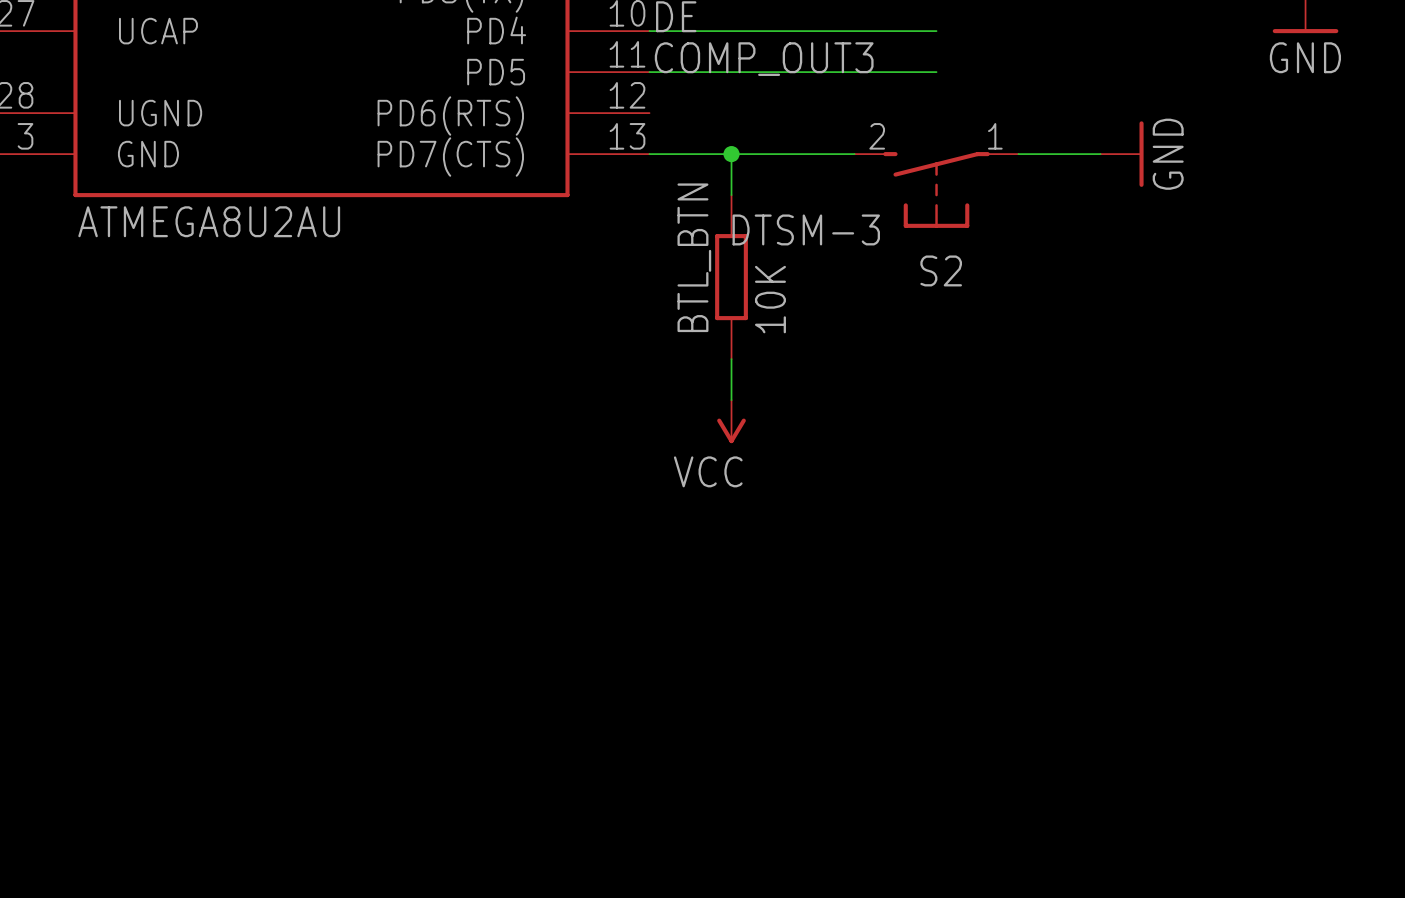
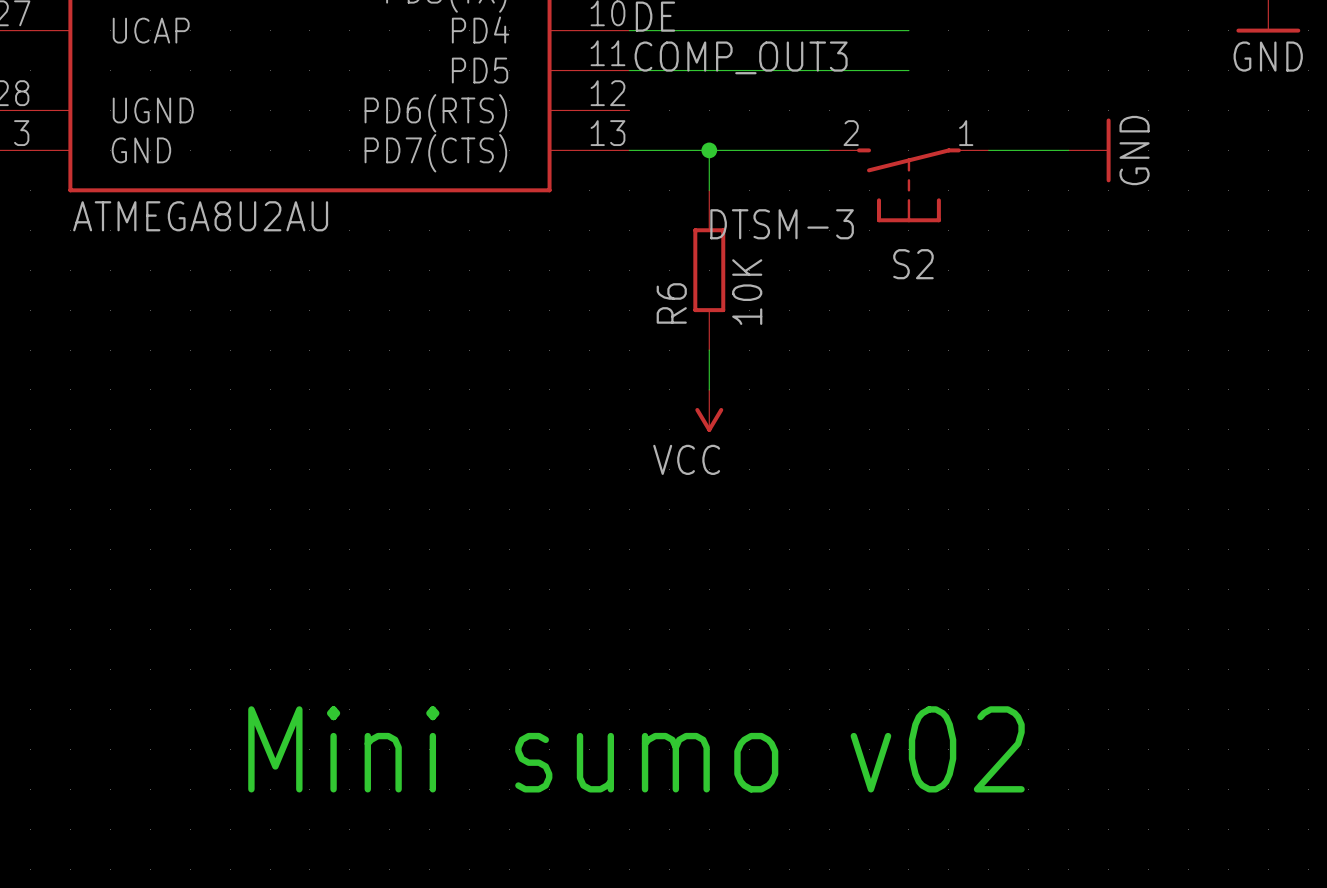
BTL_BTN name: BTL_BTN (694, 257) -> R6 (671, 303)
text: none -> Mini sumo v02 (636, 749)

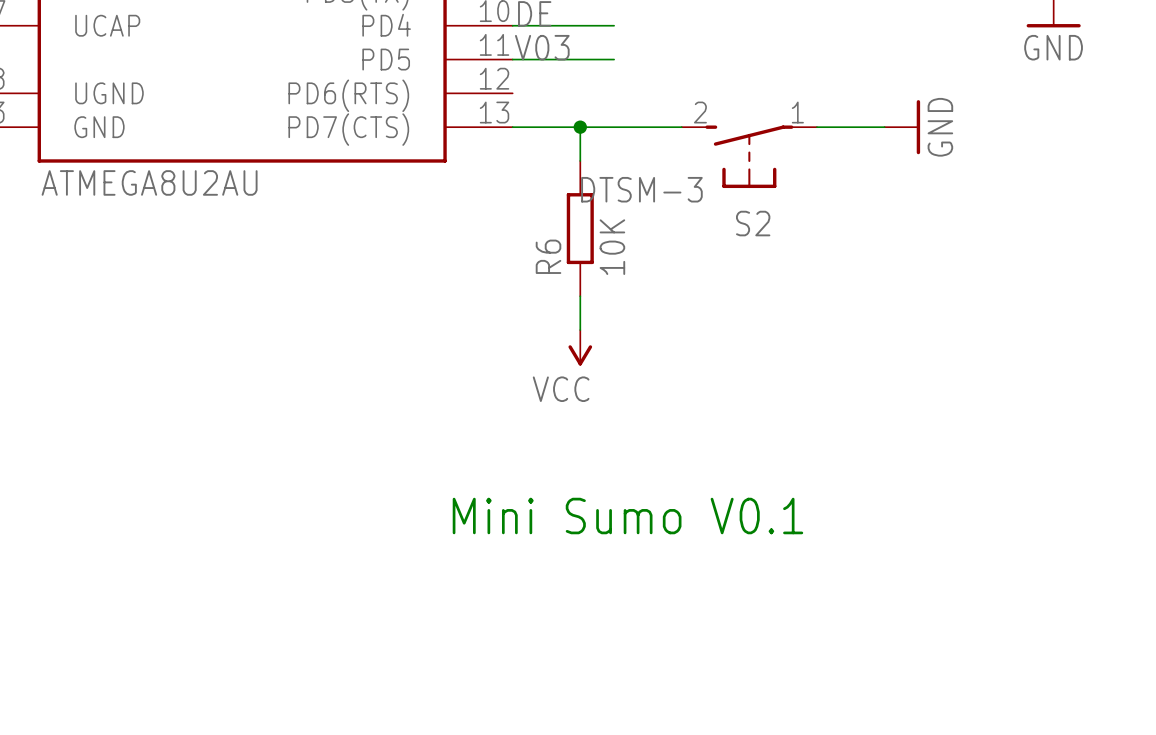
wire: (749, 30) (908, 30) -> none
label: COMP_OUT3 (741, 57) -> V03 (542, 47)
wire: (749, 70) (908, 70) -> none
text: none -> Mini Sumo V0.1 (627, 516)
text: Mini sumo v02 (636, 749) -> none

